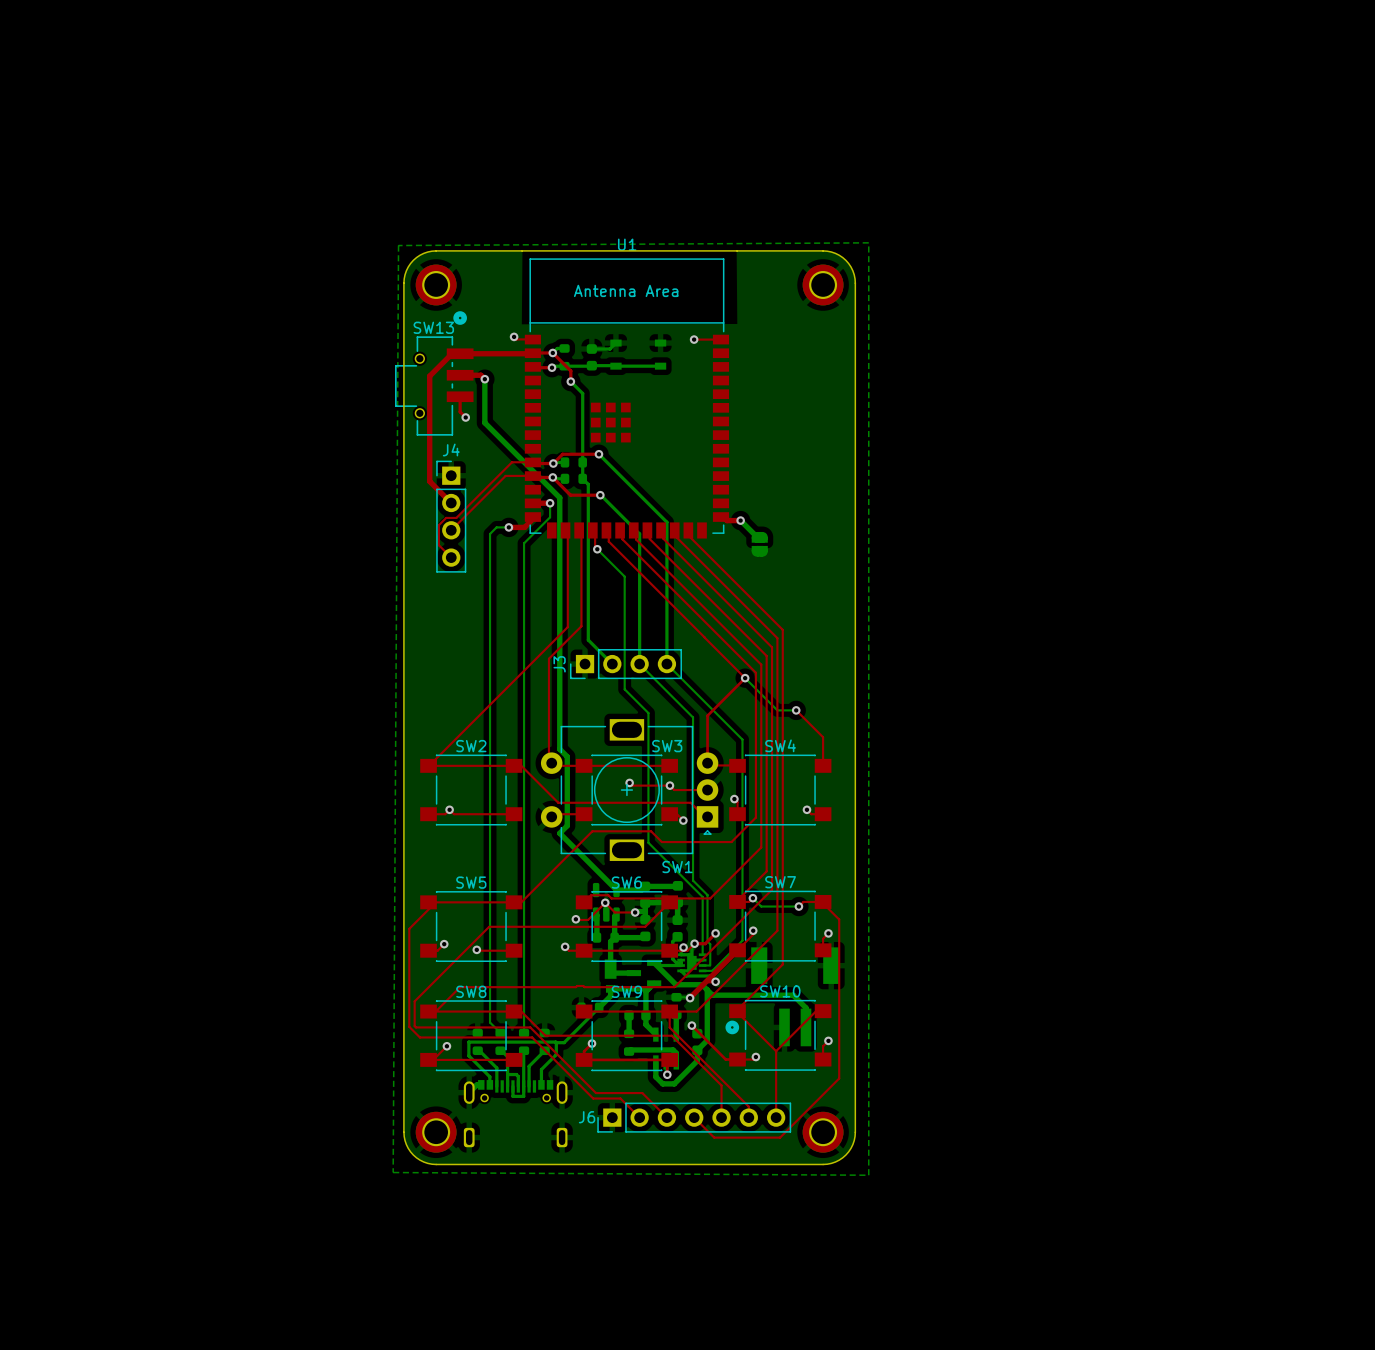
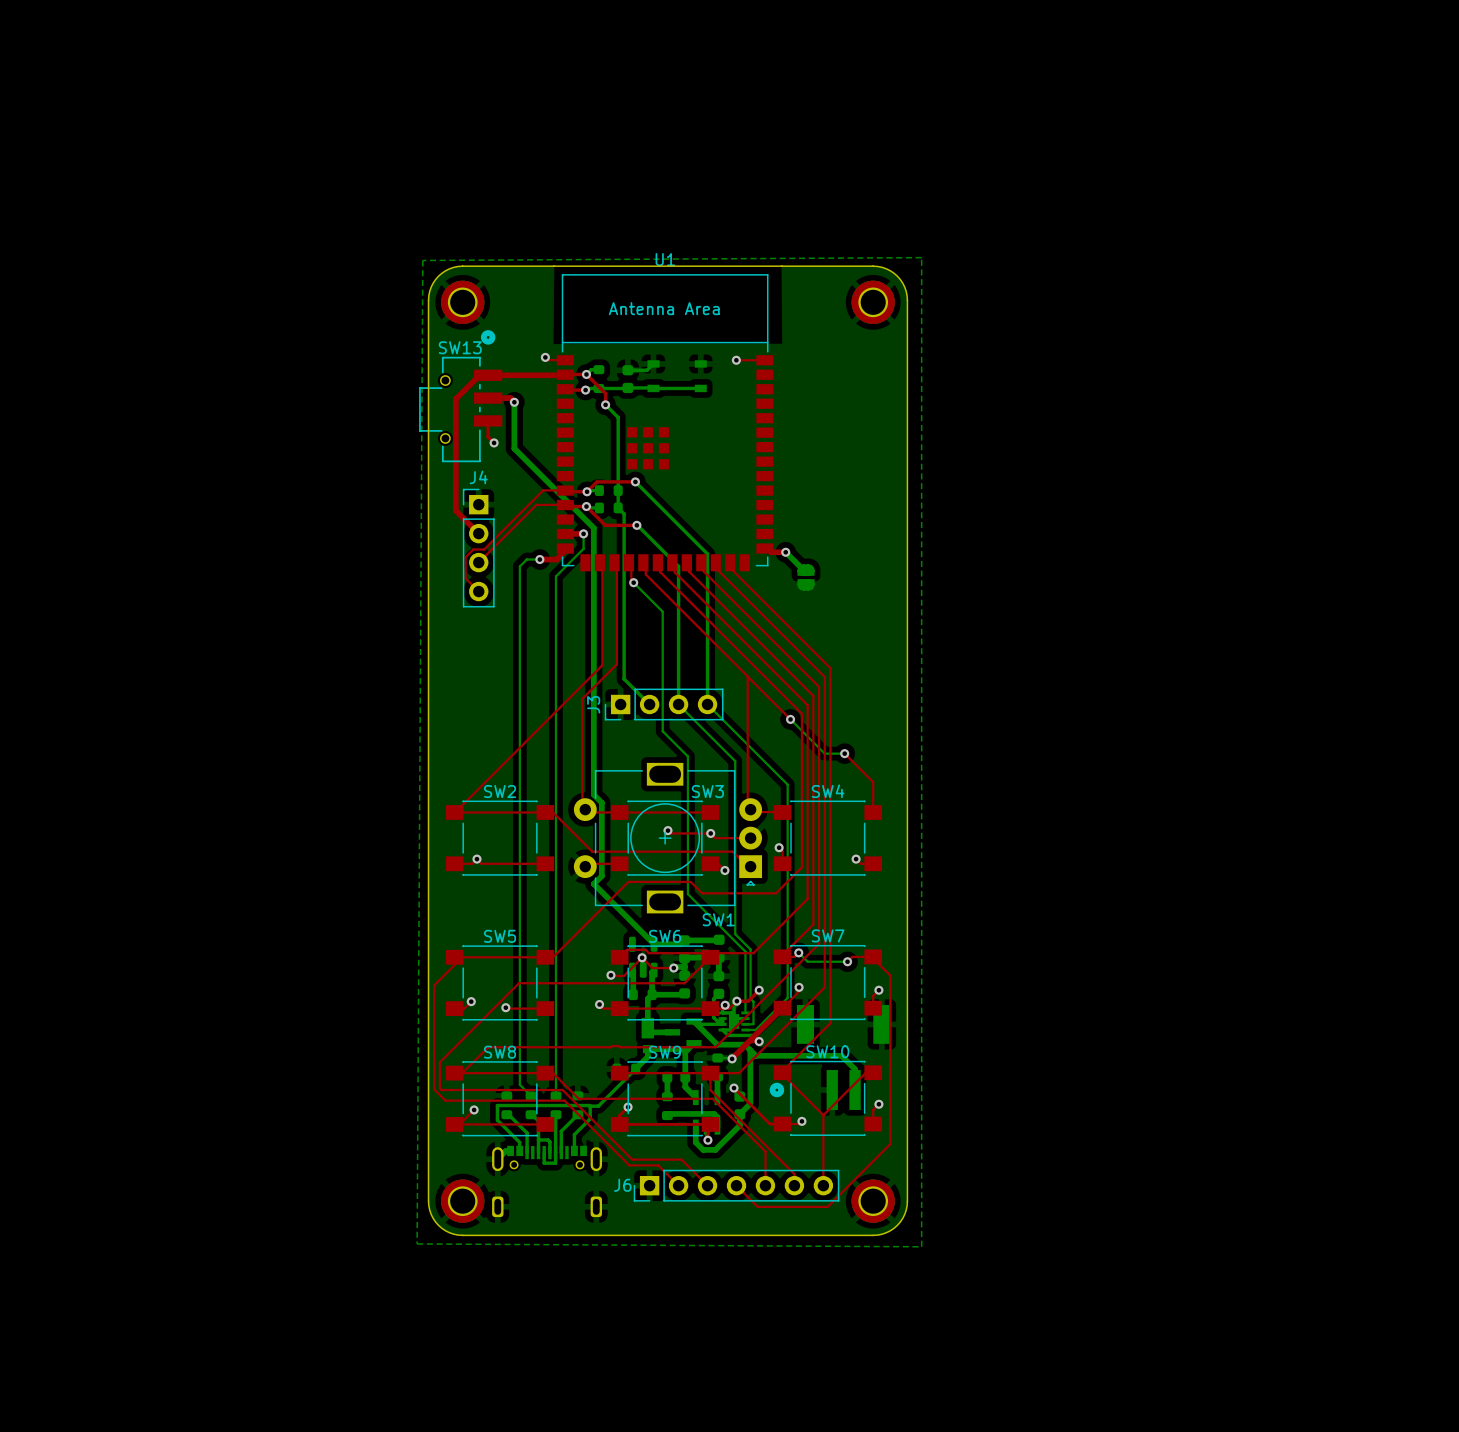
top track: none -> (747, 676) (747, 809)
top track: (745, 678) (707, 715) (707, 763) -> none

